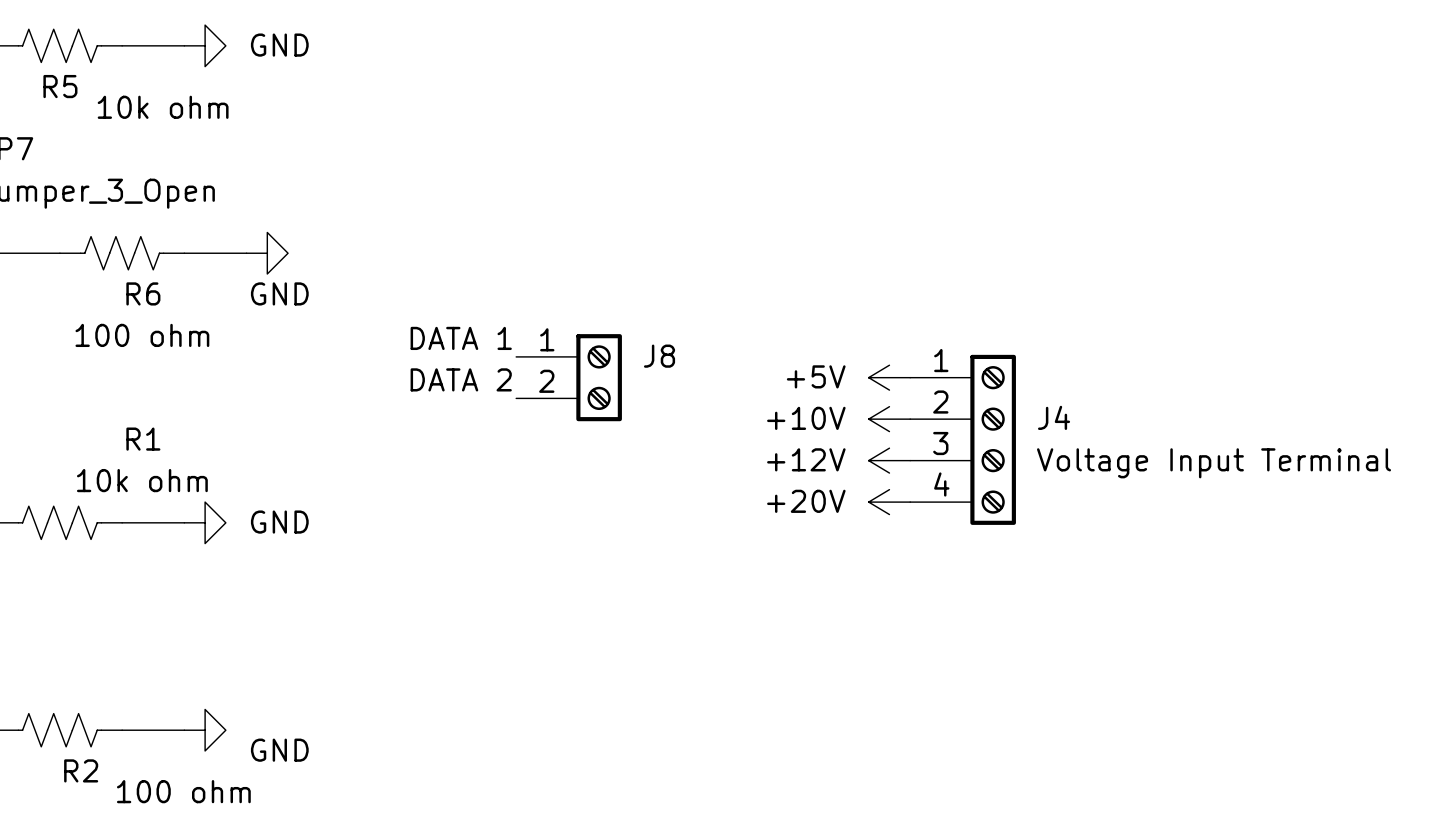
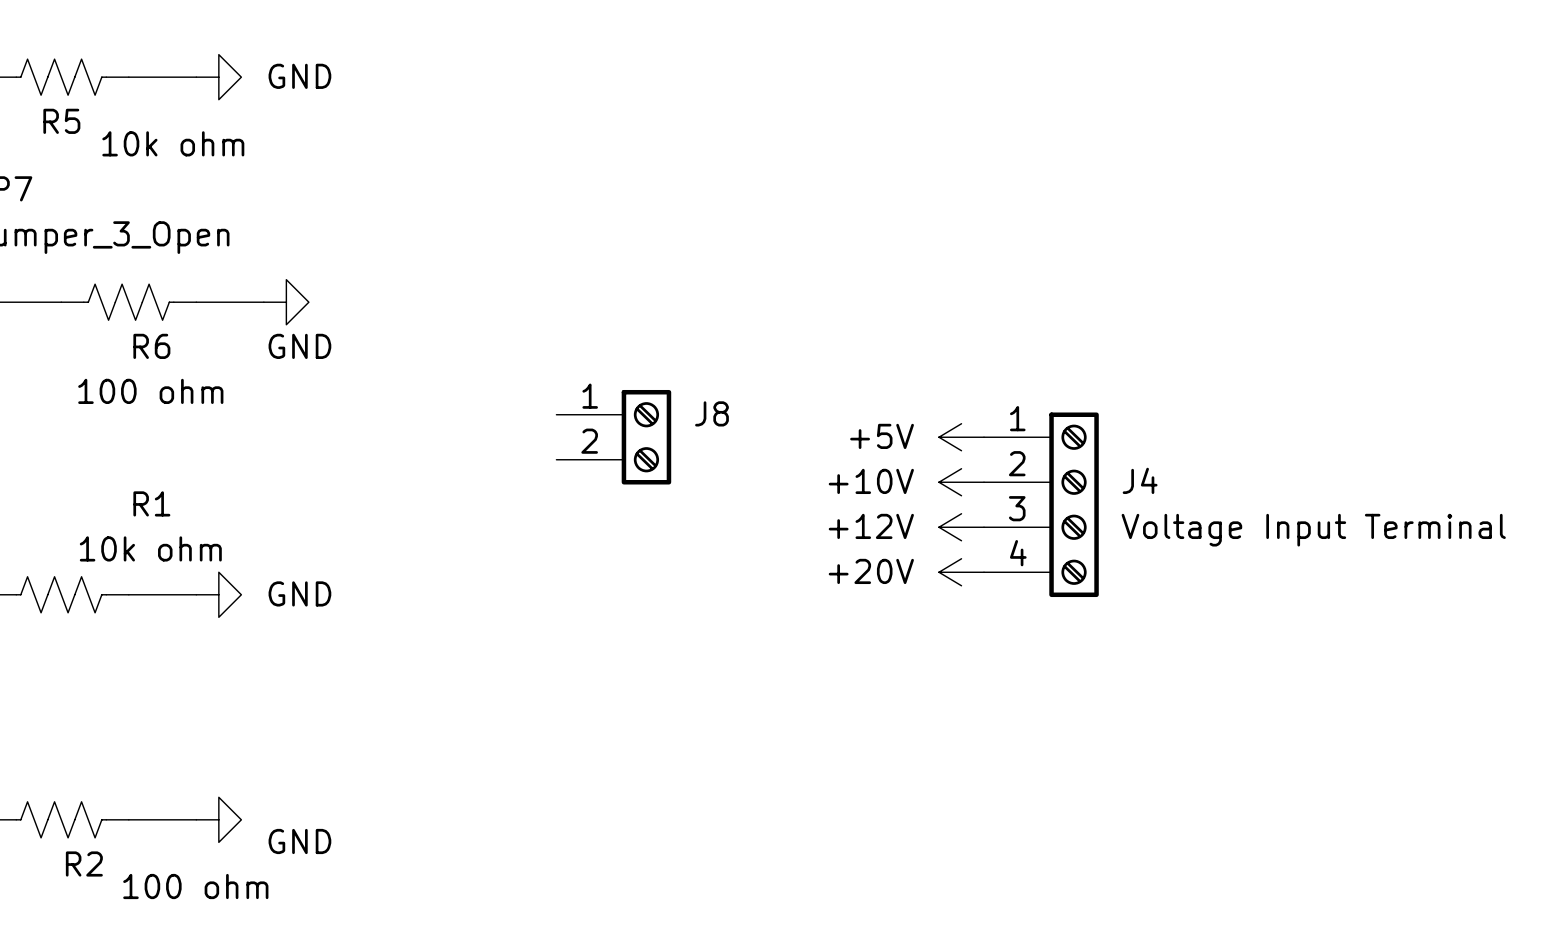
label: DATA 1 (461, 338) -> none
label: DATA 2 (461, 379) -> none

